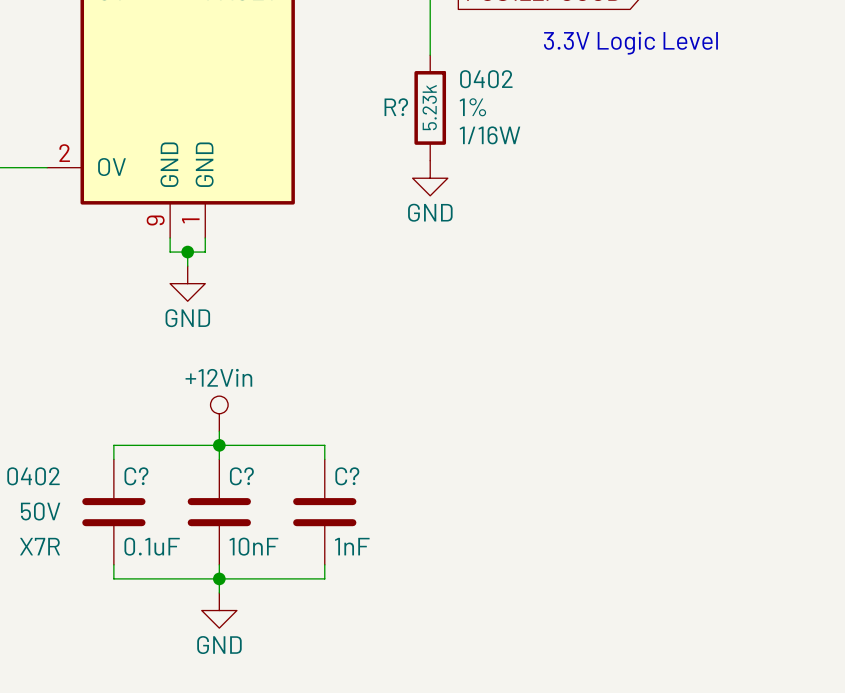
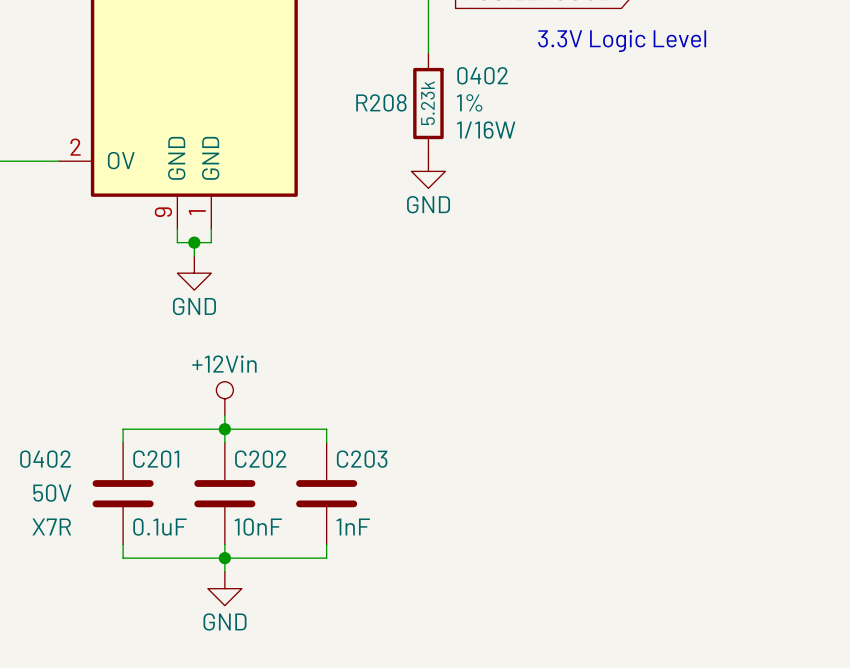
R? name: R? (396, 107) -> R208 (381, 102)
C? name: C? (136, 476) -> C201 (156, 459)
C? name: C? (241, 476) -> C202 (260, 459)
C? name: C? (347, 476) -> C203 (362, 459)

